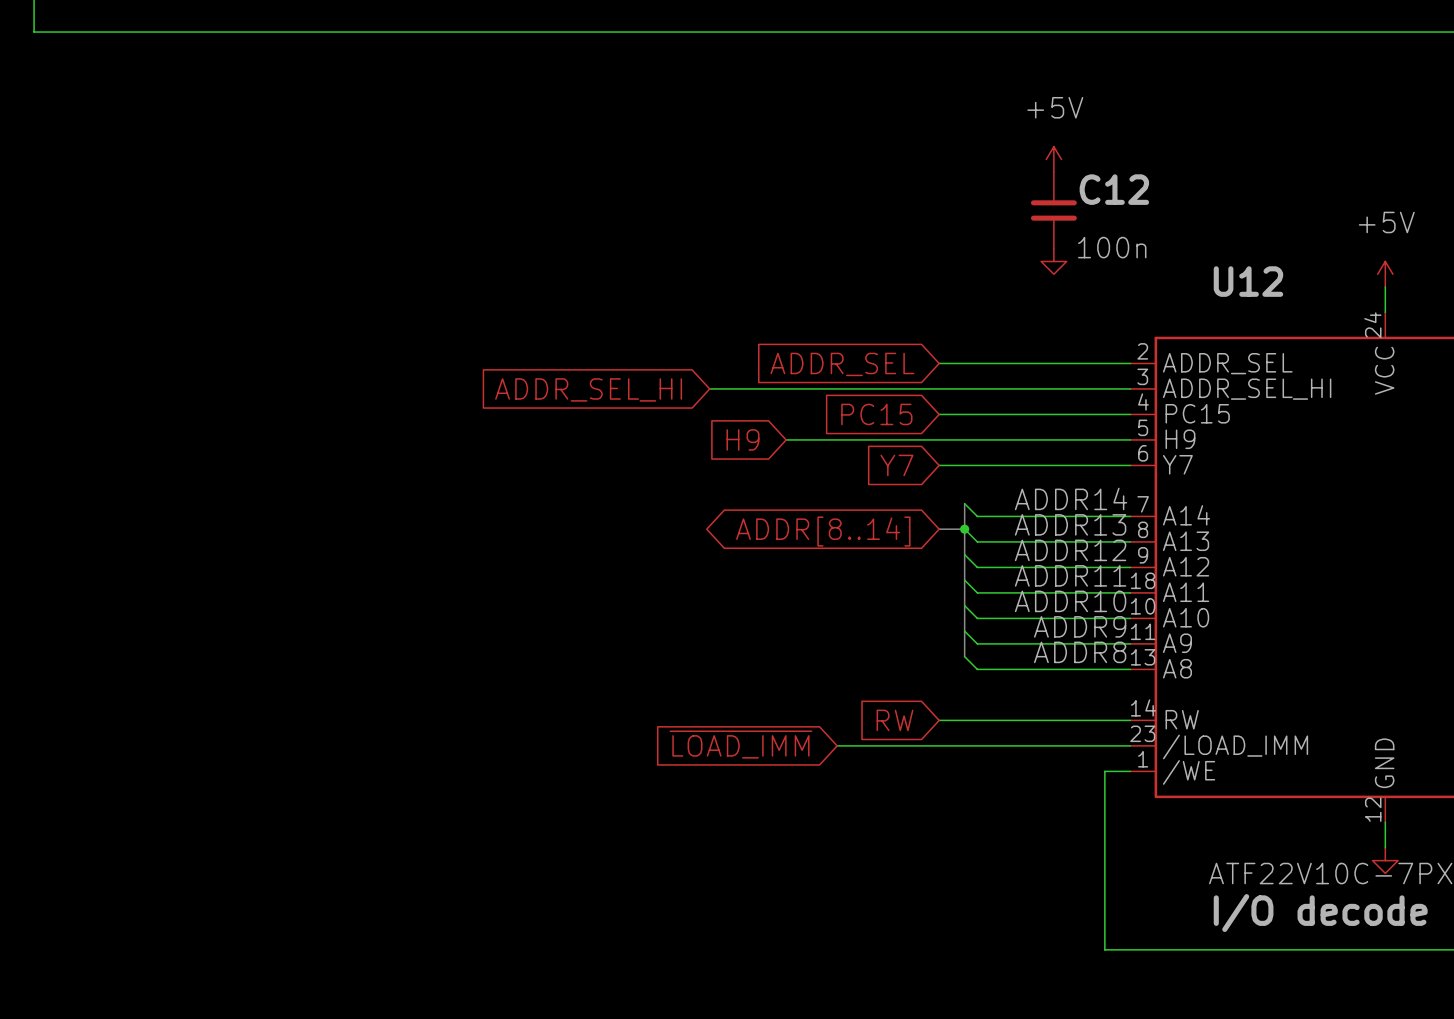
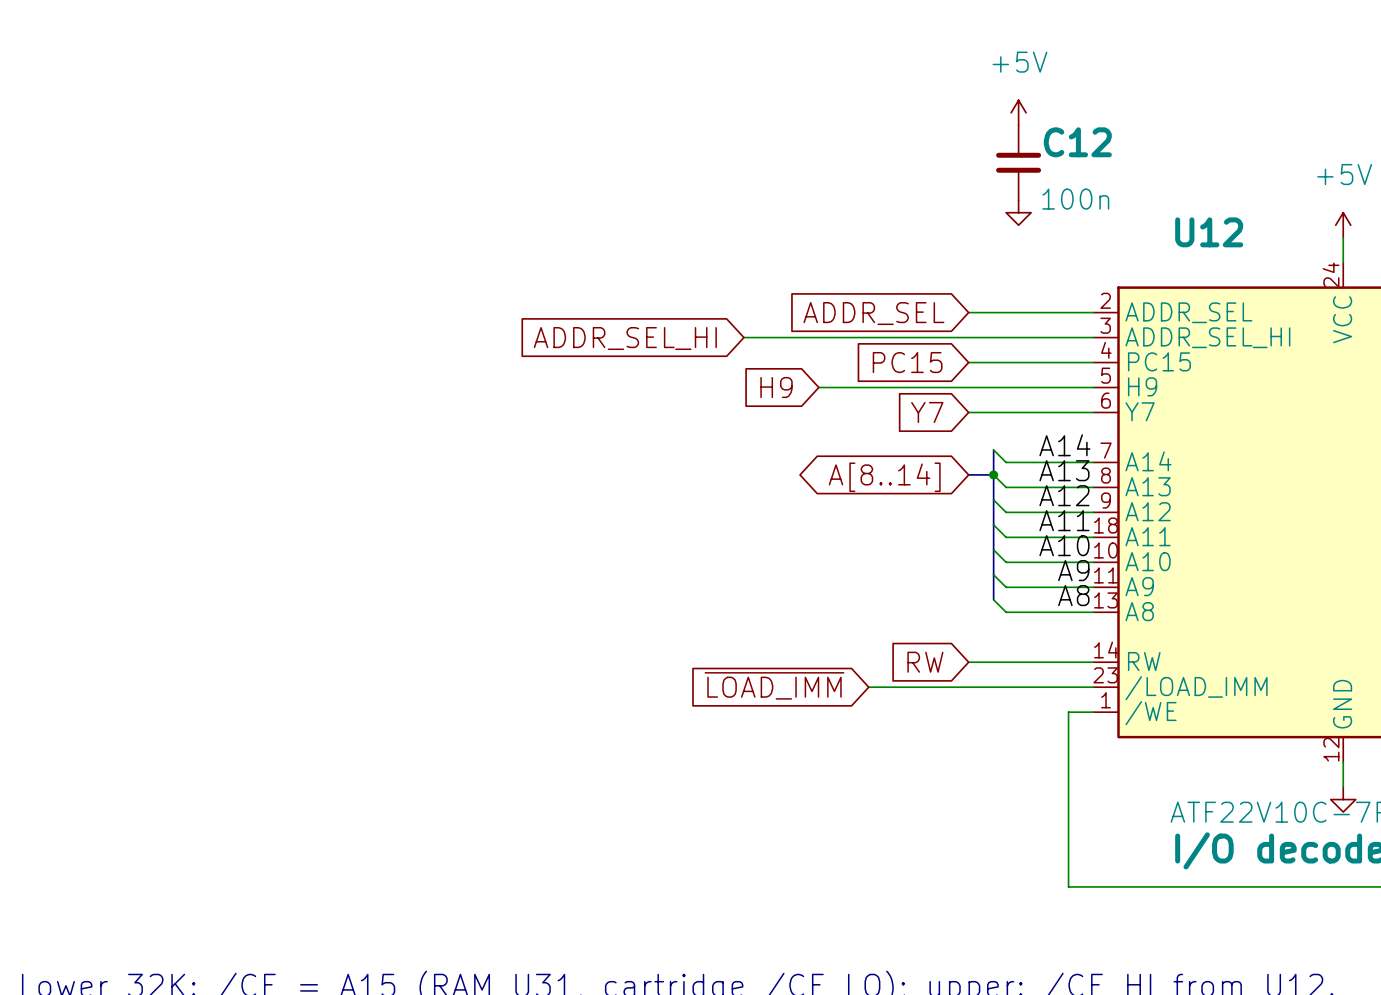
wire: (939, 363) (1002, 363) -> none
global label position: ADDR_SEL (842, 364) -> ADDR_SEL (873, 313)
wire: (709, 388) (773, 388) -> none
global label position: ADDR_SEL_HI (588, 389) -> ADDR_SEL_HI (625, 338)
global label position: PC15 (876, 414) -> PC15 (907, 362)
wire: (939, 414) (1002, 414) -> none
global label position: H9 (742, 439) -> H9 (776, 387)
wire: (786, 439) (849, 439) -> none
global label position: Y7 (896, 465) -> Y7 (927, 412)
wire: (939, 465) (1002, 465) -> none
label: ADDR14 (1071, 498) -> A14 (1064, 445)
wire: (964, 503) (977, 516) (1041, 516) -> (993, 449) (1006, 462)
bus: (964, 503) (964, 656) -> (993, 449) (993, 599)
label: ADDR13 (1070, 524) -> A13 (1064, 470)
bus: (939, 529) (964, 529) -> (968, 474) (993, 474)
wire: (964, 529) (977, 541) (1041, 541) -> (993, 474) (1006, 487)
junction: (964, 529) -> none
junction: none -> (993, 474)
global label: ADDR[8..14] (823, 531) -> A[8..14] (884, 477)
label: ADDR12 (1070, 550) -> A12 (1064, 495)
wire: (964, 554) (977, 567) (1041, 567) -> (993, 499) (1006, 512)
label: ADDR11 (1070, 575) -> A11 (1064, 520)
wire: (964, 580) (977, 592) (1041, 592) -> (993, 524) (1006, 537)
label: ADDR10 (1070, 601) -> A10 (1064, 545)
wire: (964, 605) (977, 618) (1041, 618) -> (993, 549) (1006, 562)
label: ADDR9 (1080, 626) -> A9 (1073, 570)
wire: (964, 631) (977, 643) (1041, 643) -> (993, 574) (1006, 587)
label: ADDR8 (1080, 652) -> A8 (1073, 595)
wire: (964, 656) (977, 669) (1041, 669) -> (993, 599) (1006, 612)
global label position: RW (895, 720) -> RW (925, 662)
wire: (939, 720) (1002, 720) -> none
global label position: ~{LOAD_IMM} (740, 744) -> ~{LOAD_IMM} (774, 685)
wire: (837, 745) (900, 745) -> none

